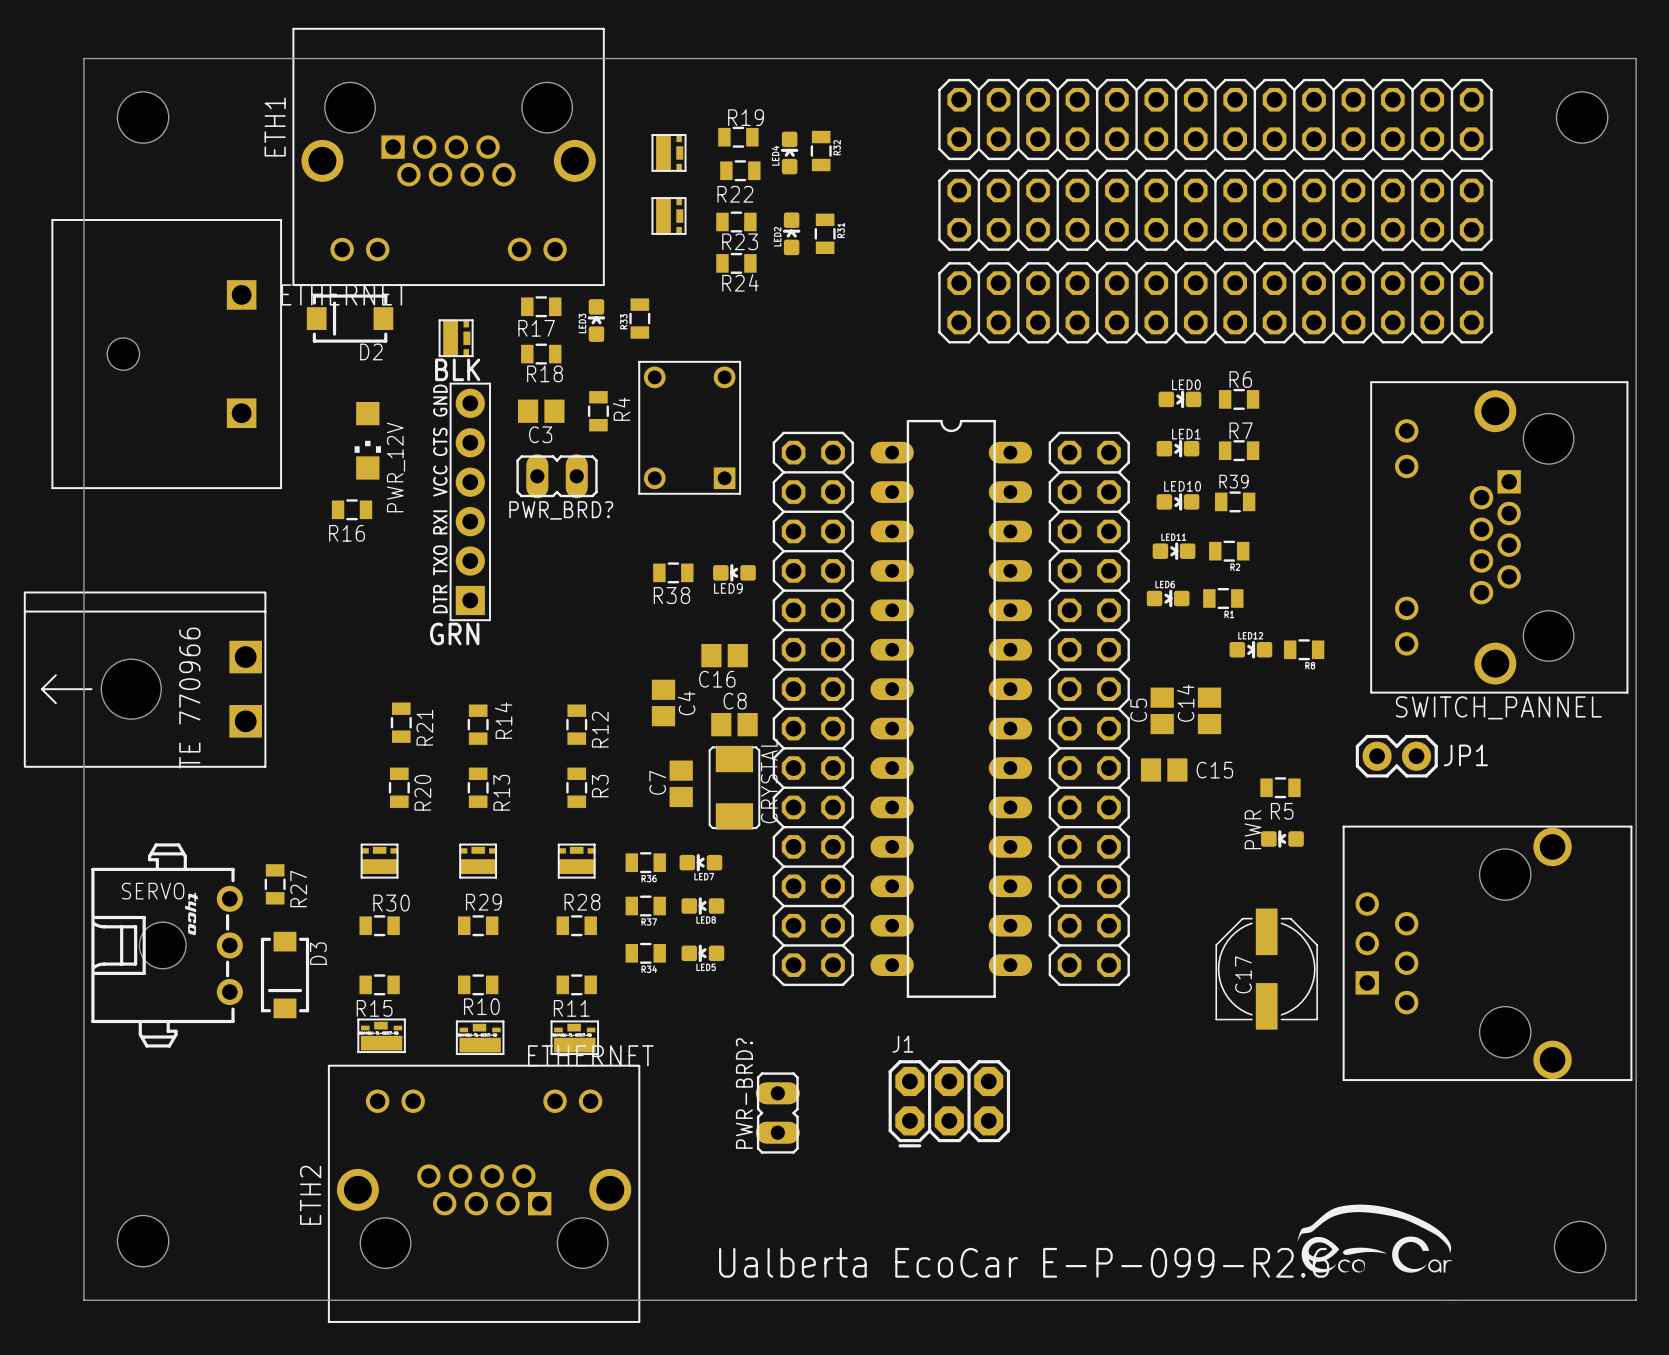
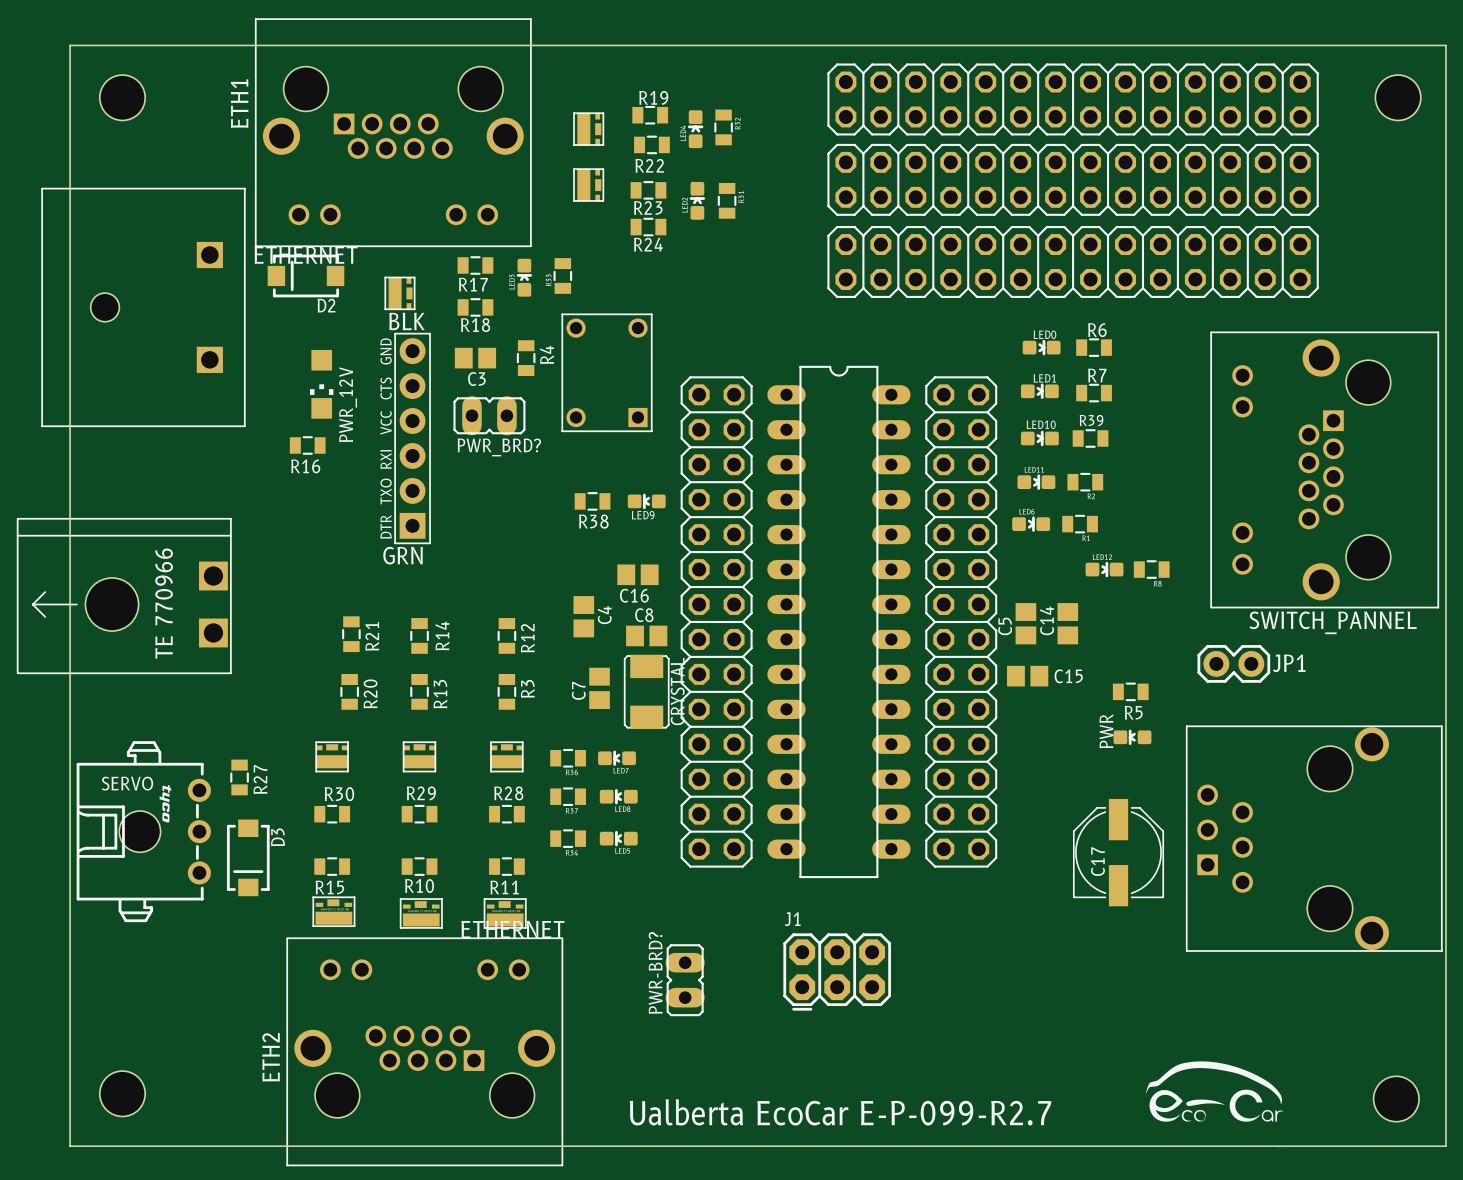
text: Ualberta EcoCar E-P-099-R2.6 (1024, 1262) -> Ualberta EcoCar E-P-099-R2.7 (840, 1112)

